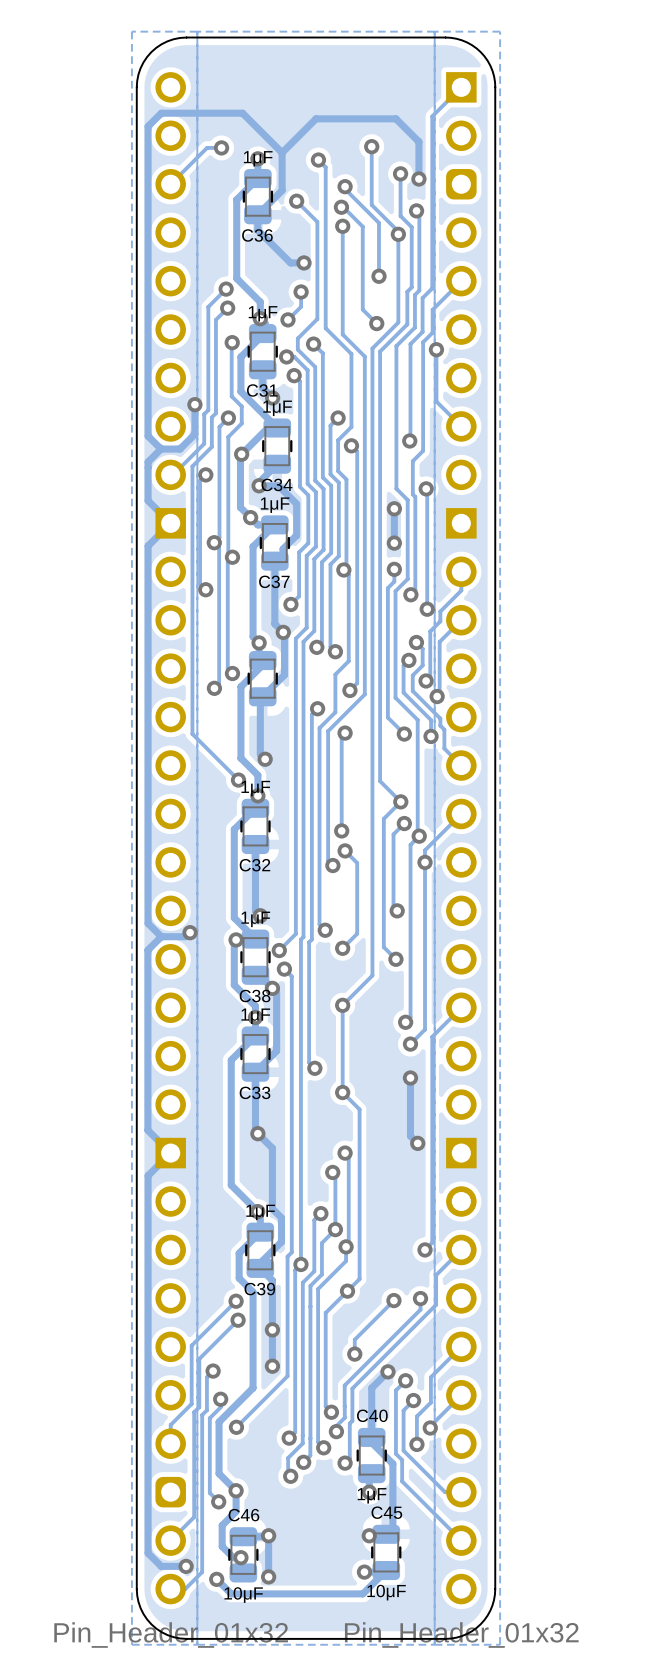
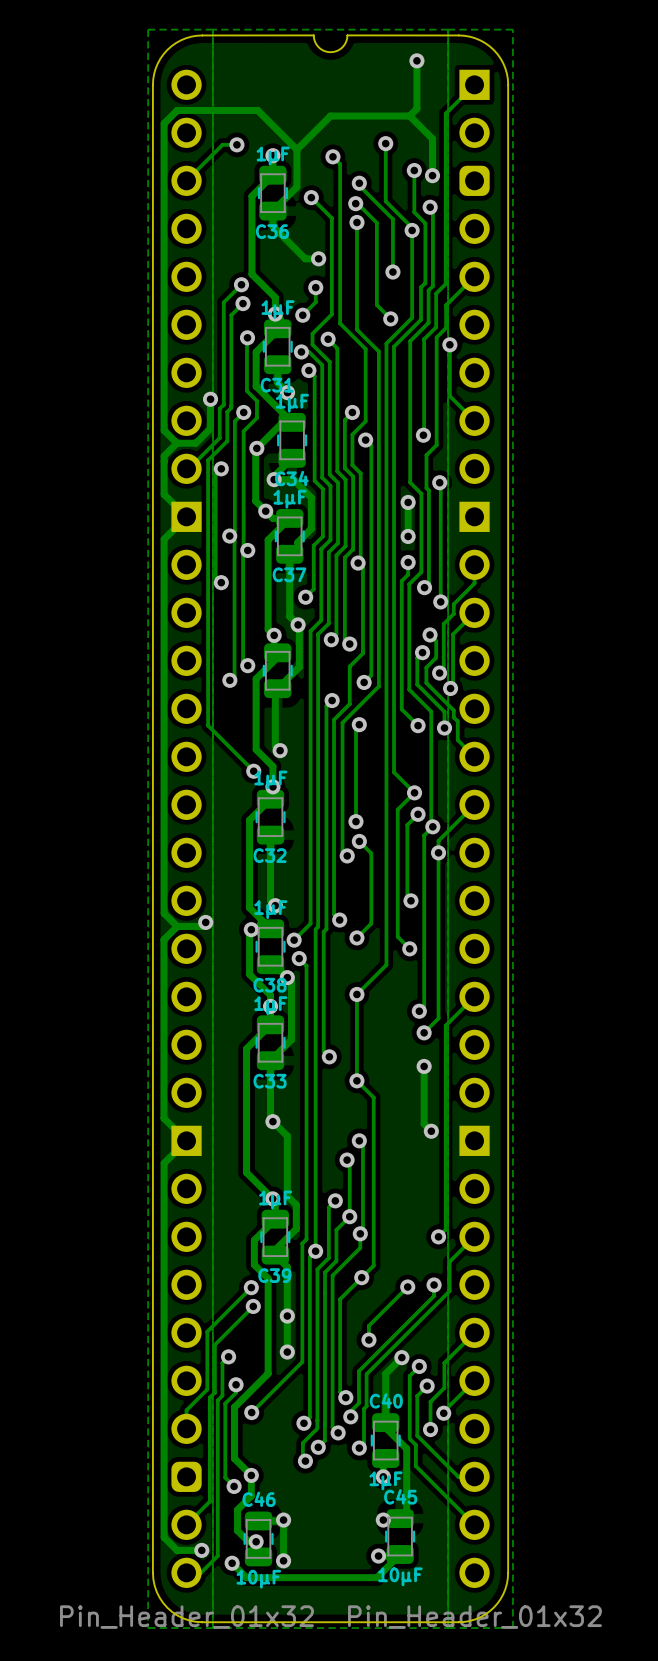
part footprint: [135, 36, 497, 1640] -> [151, 34, 510, 1624]
track: none -> (416, 60) (416, 108) (409, 116)
via: none -> (416, 60)

